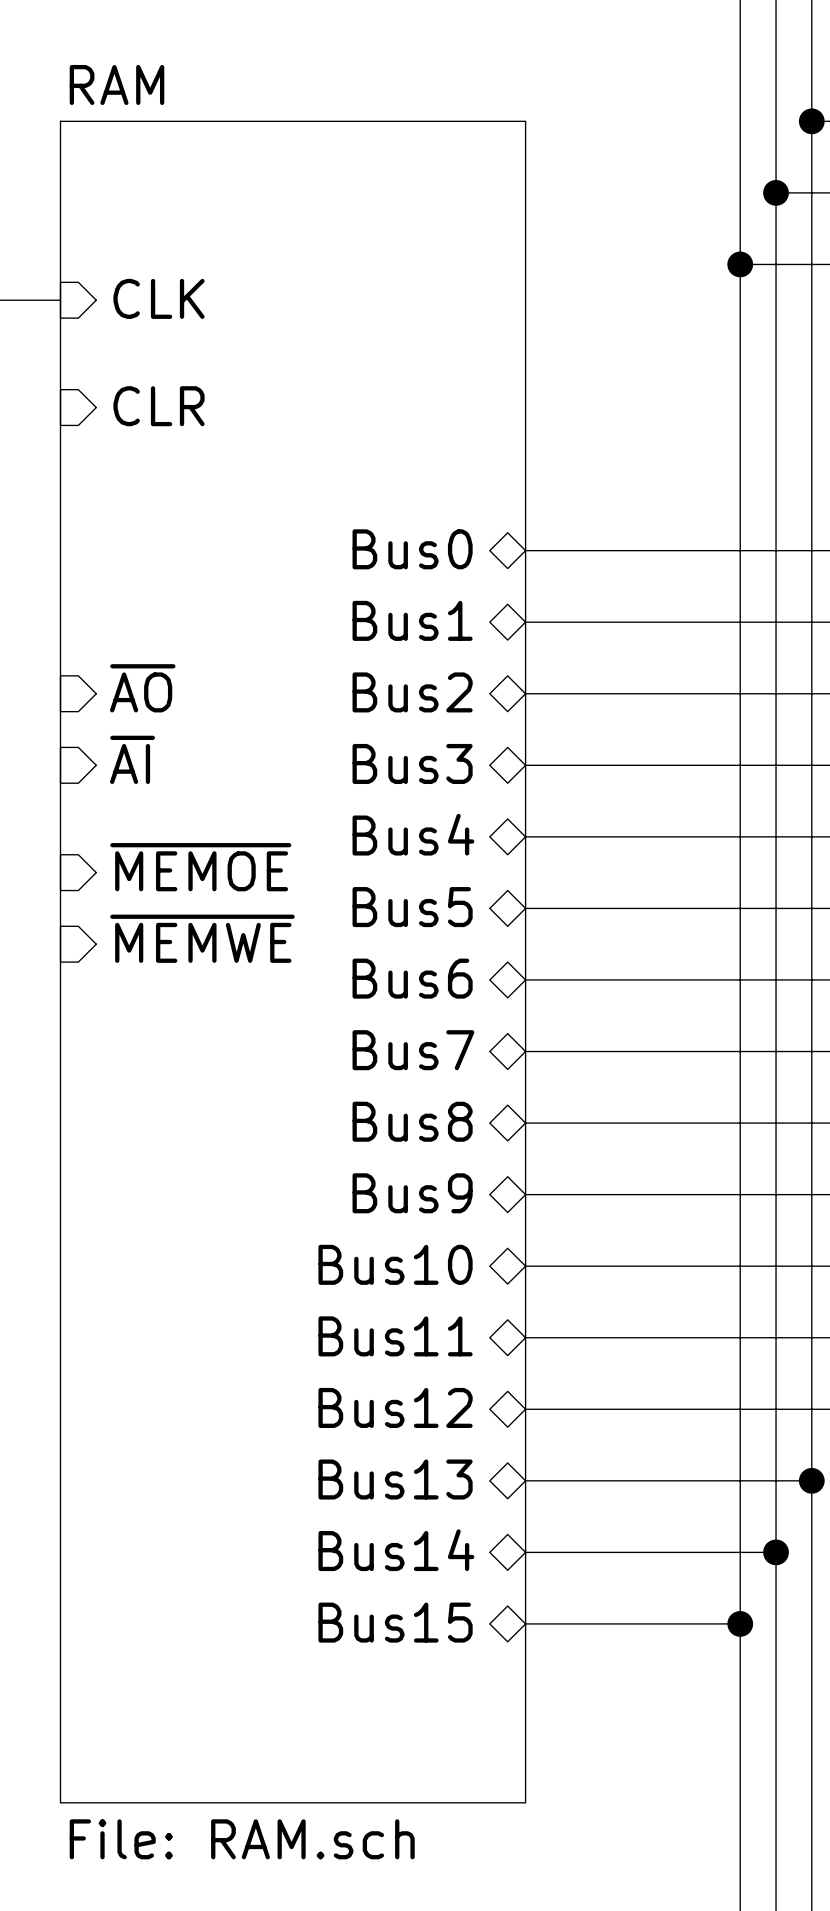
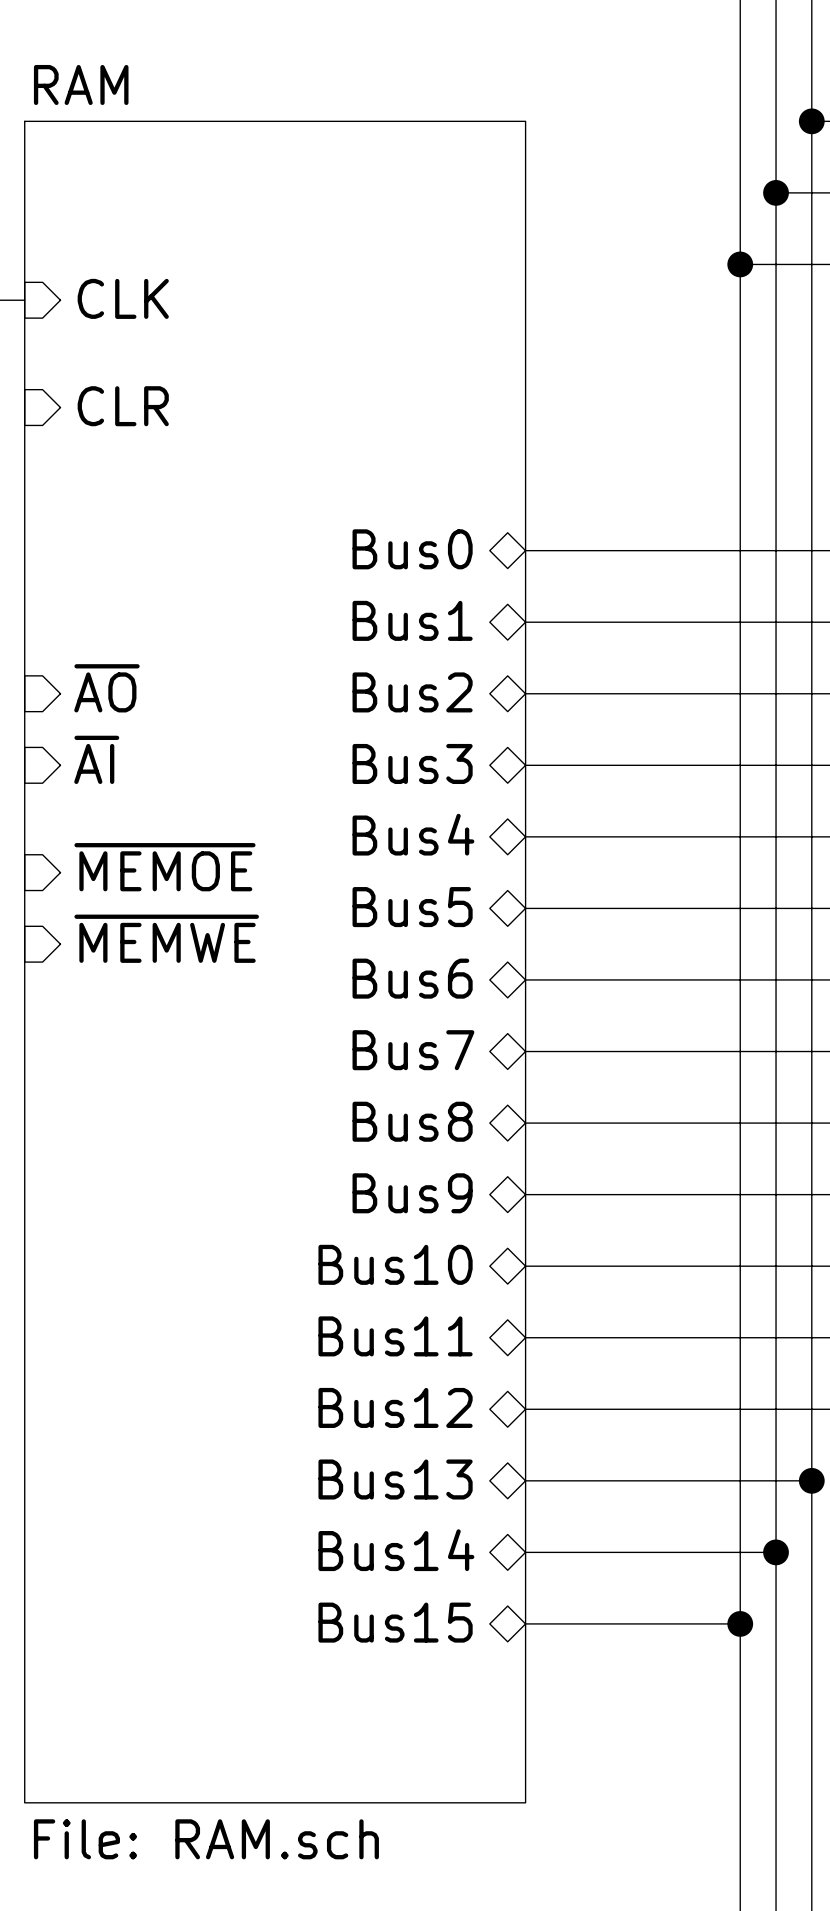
sheet RAM shape: [60, 121, 526, 1803] -> [24, 121, 526, 1803]
sheet pin position: CLK (159, 298) -> CLK (123, 298)
wire: (24, 300) (60, 300) -> none
sheet pin position: CLR (159, 406) -> CLR (123, 406)
sheet pin position: ~{AO} (142, 688) -> ~{AO} (106, 688)
sheet pin position: ~{AI} (132, 759) -> ~{AI} (96, 759)
sheet pin position: ~{MEMOE} (200, 867) -> ~{MEMOE} (164, 867)
sheet pin position: ~{MEMWE} (202, 938) -> ~{MEMWE} (166, 938)

